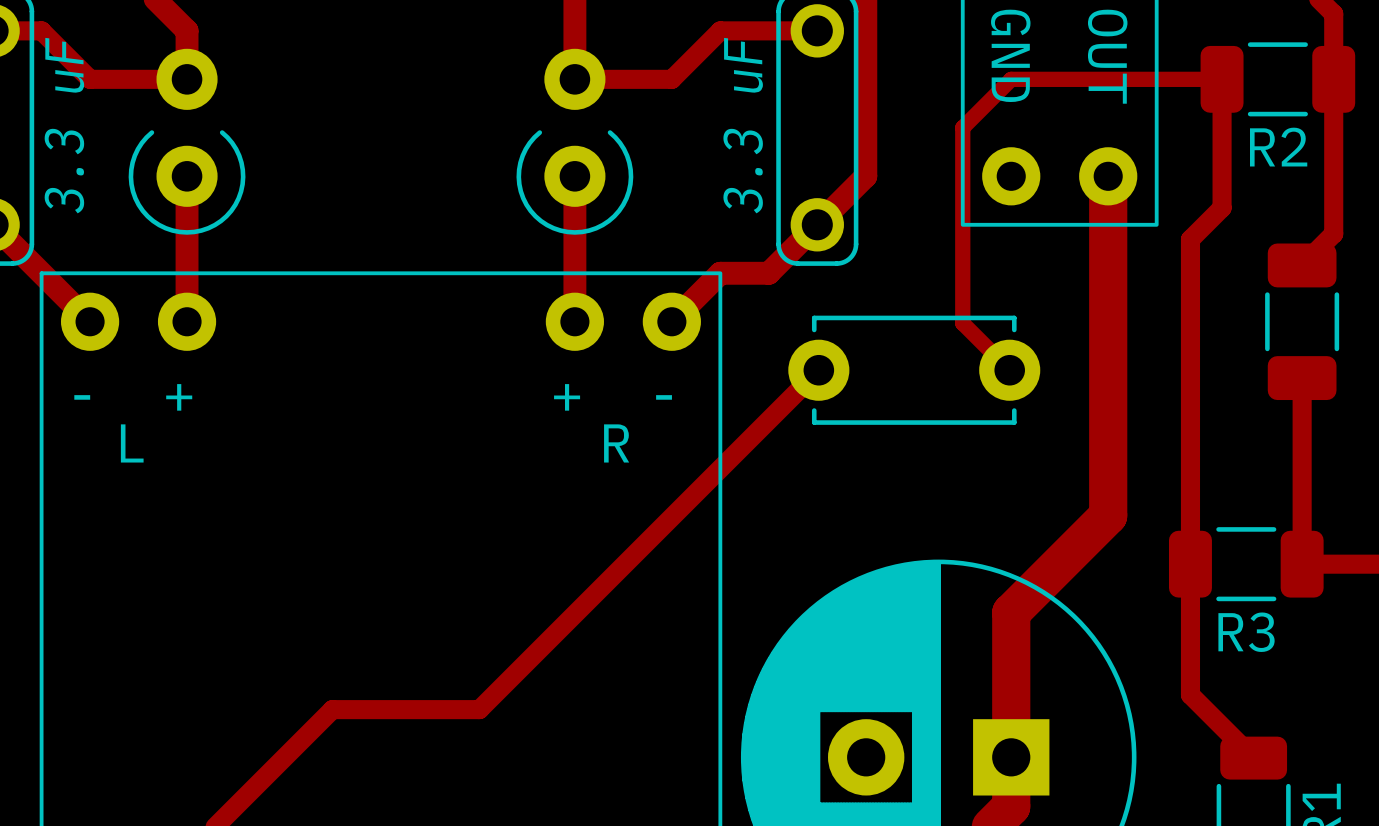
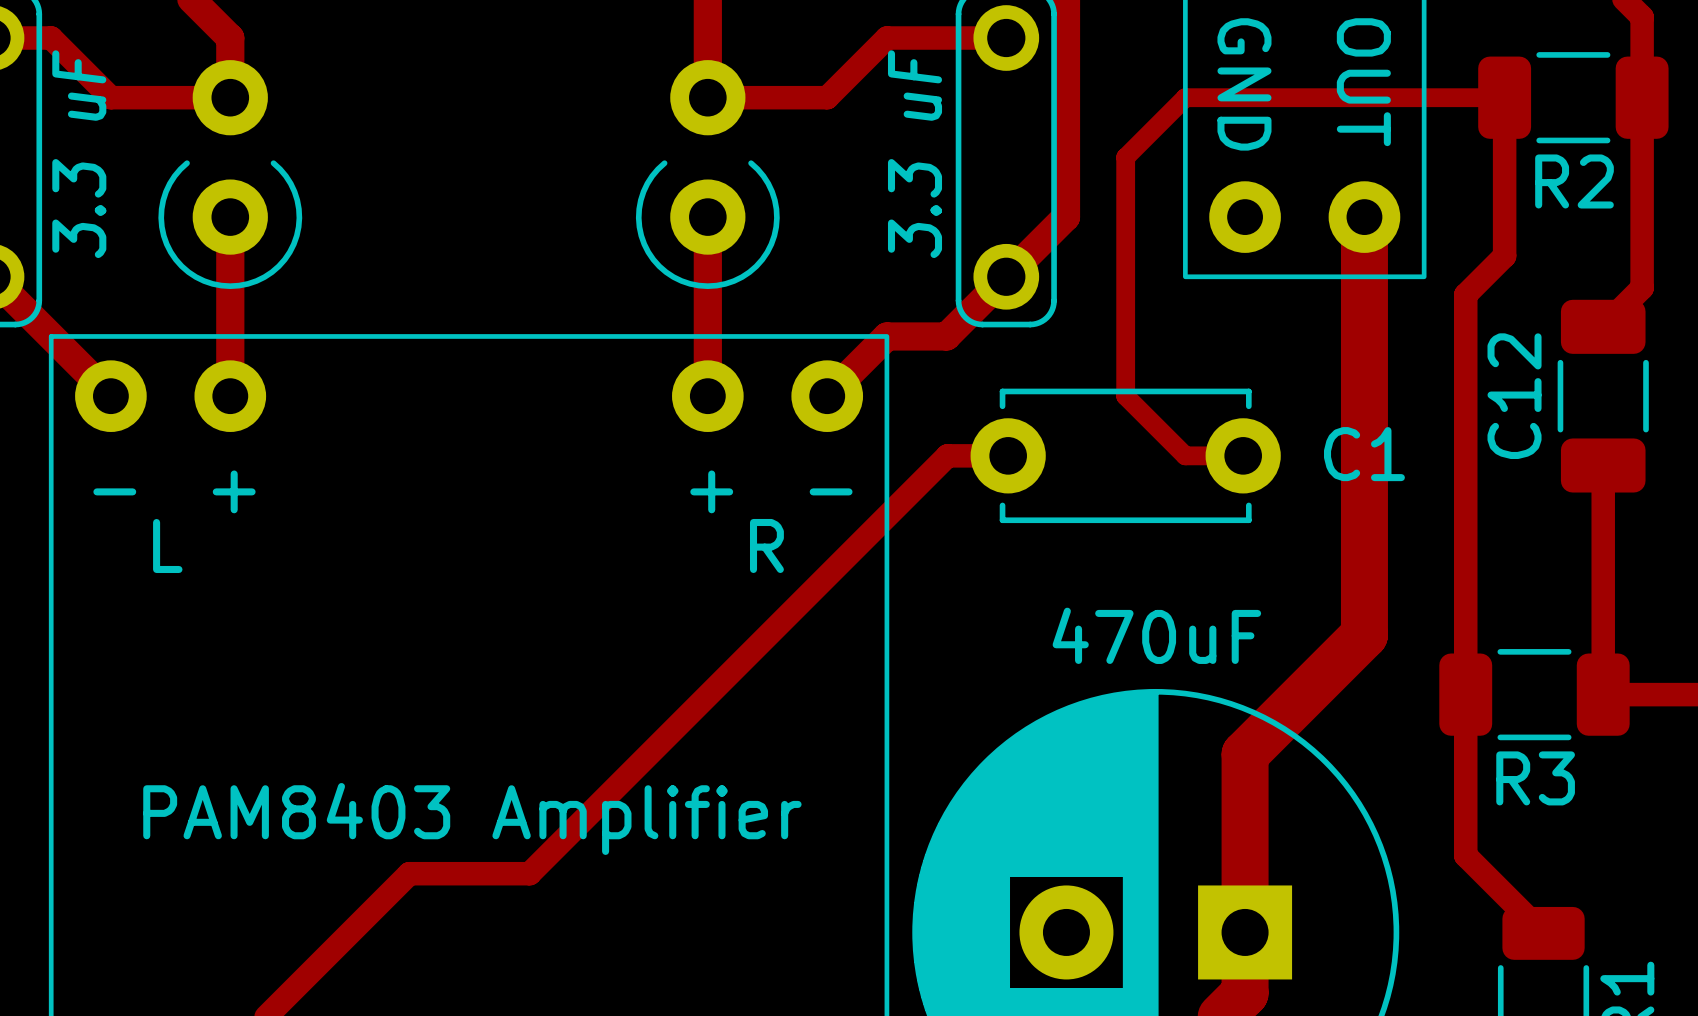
track: (1011, 79) (962, 127) (962, 323) (1009, 370) -> (1245, 97) (1185, 97) (1125, 157) (1125, 396) (1185, 455) (1243, 455)
C12 name: none -> C12 (1514, 396)
C1 name: none -> C1 (1364, 454)
track: (818, 370) (479, 709) (430, 709) -> (1008, 455) (947, 455) (529, 873)
part value: none -> 470uF (1156, 635)
part value: none -> PAM8403 Amplifier (472, 818)

